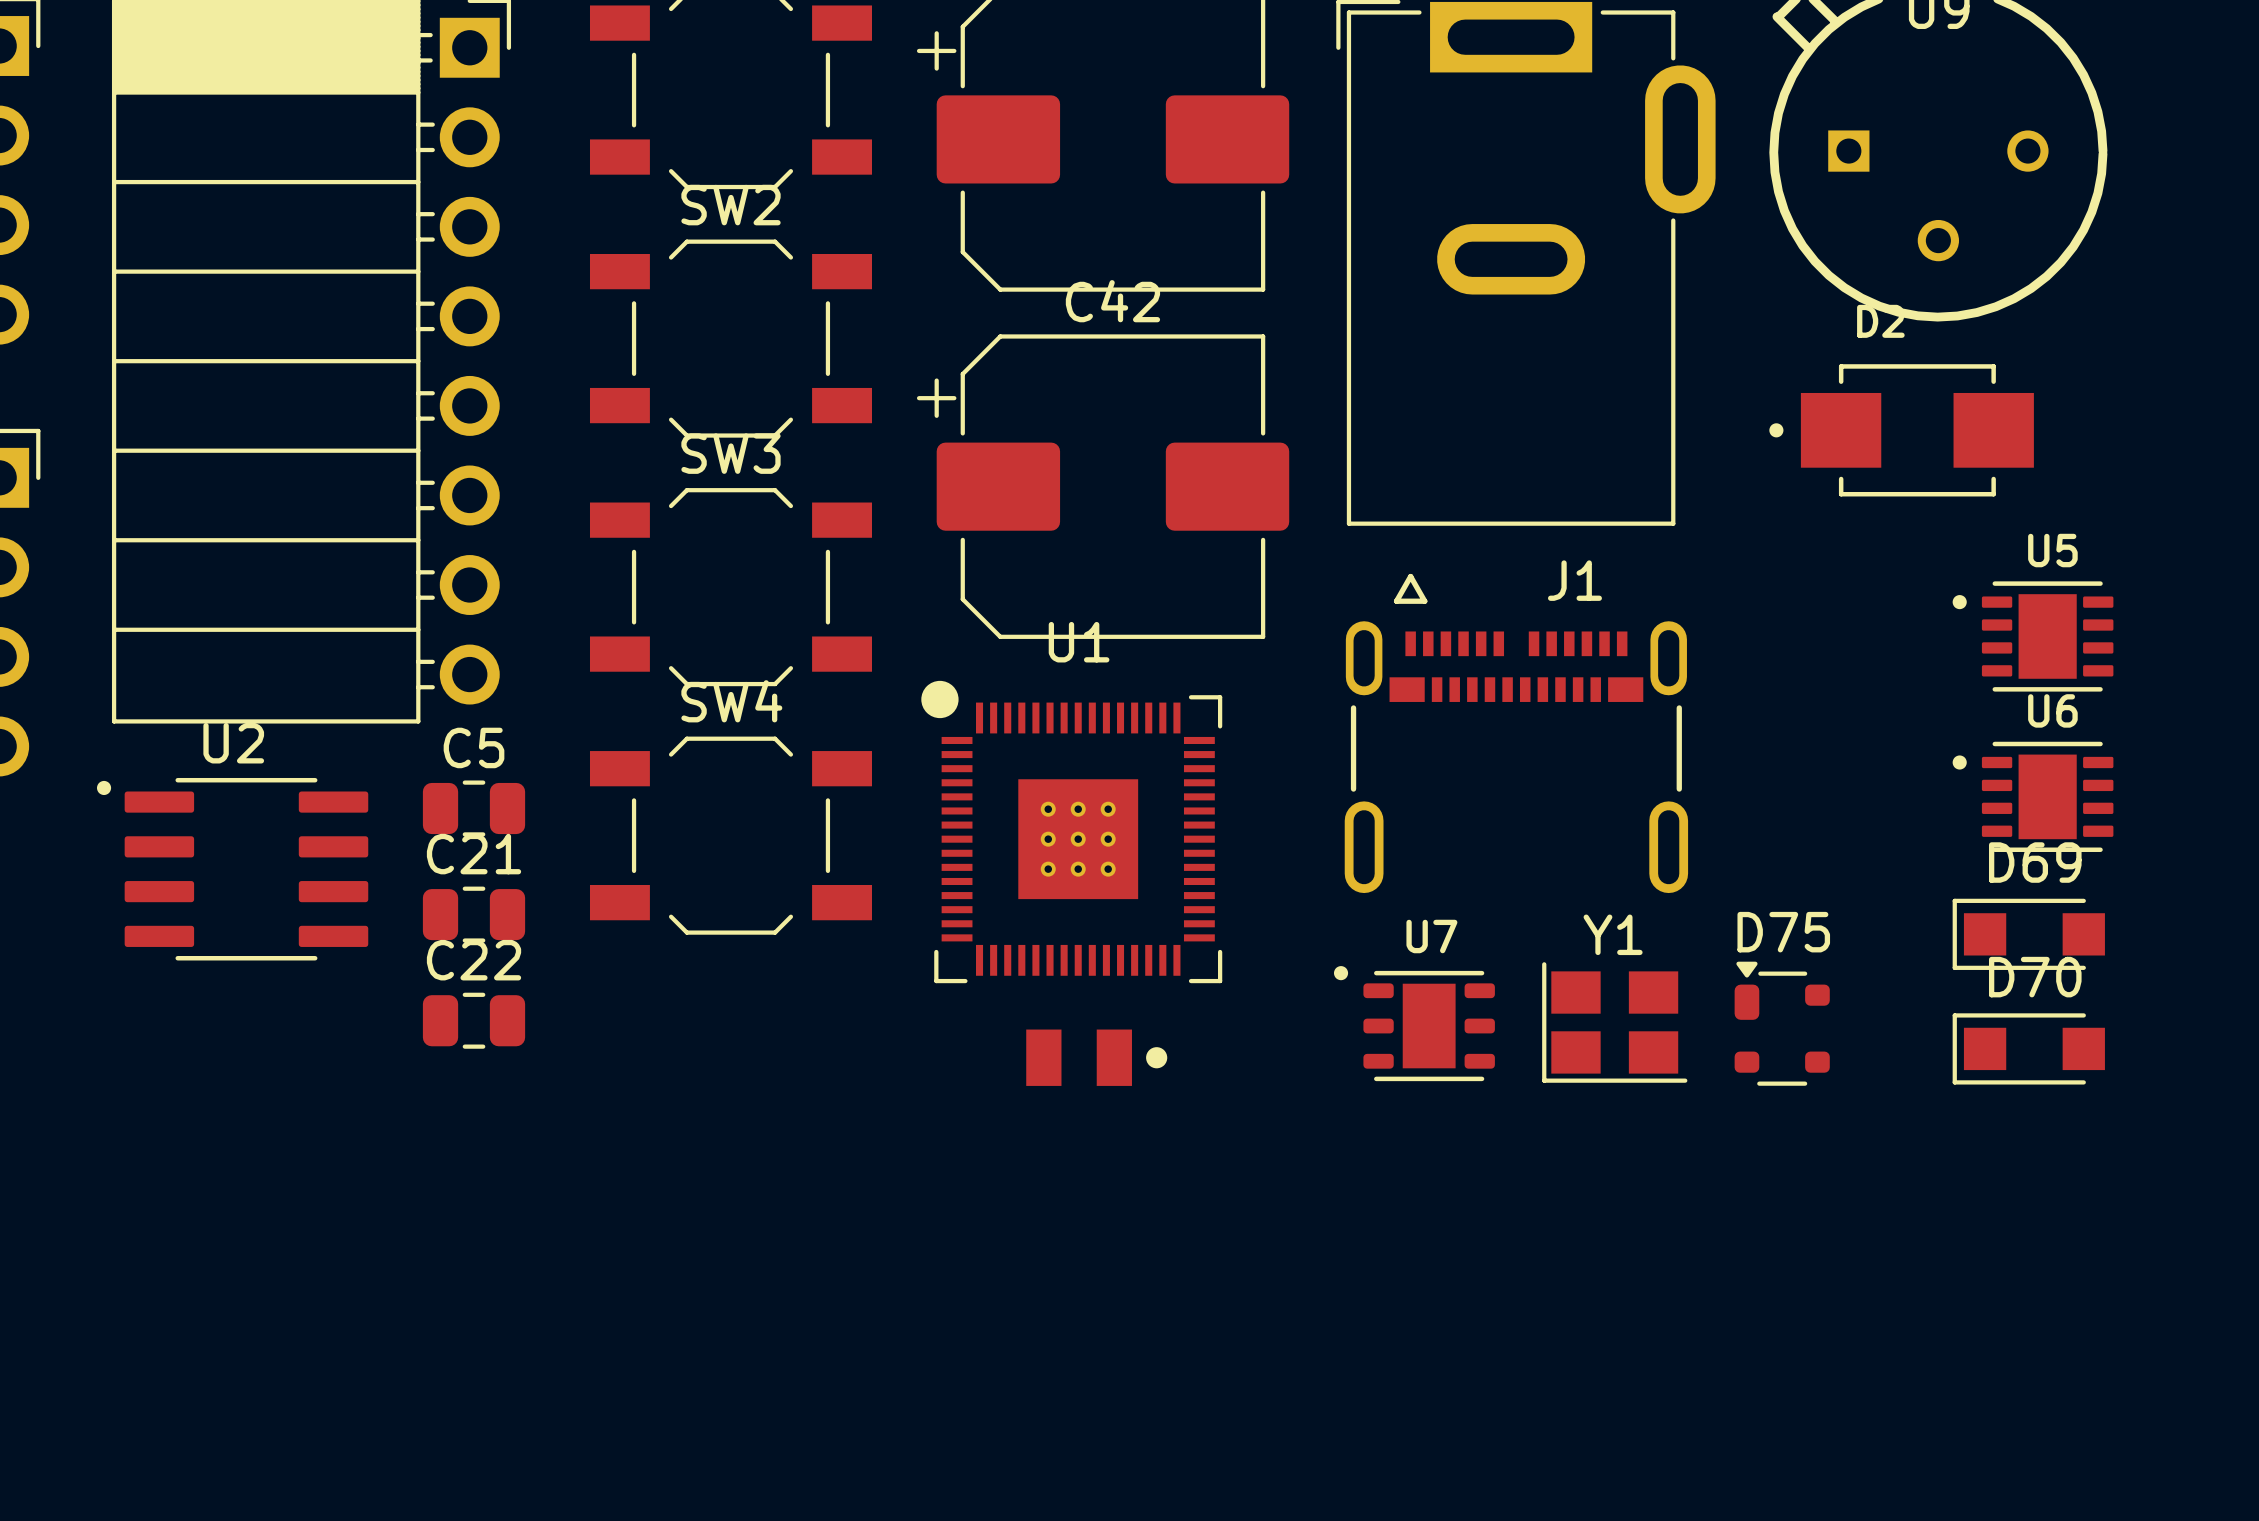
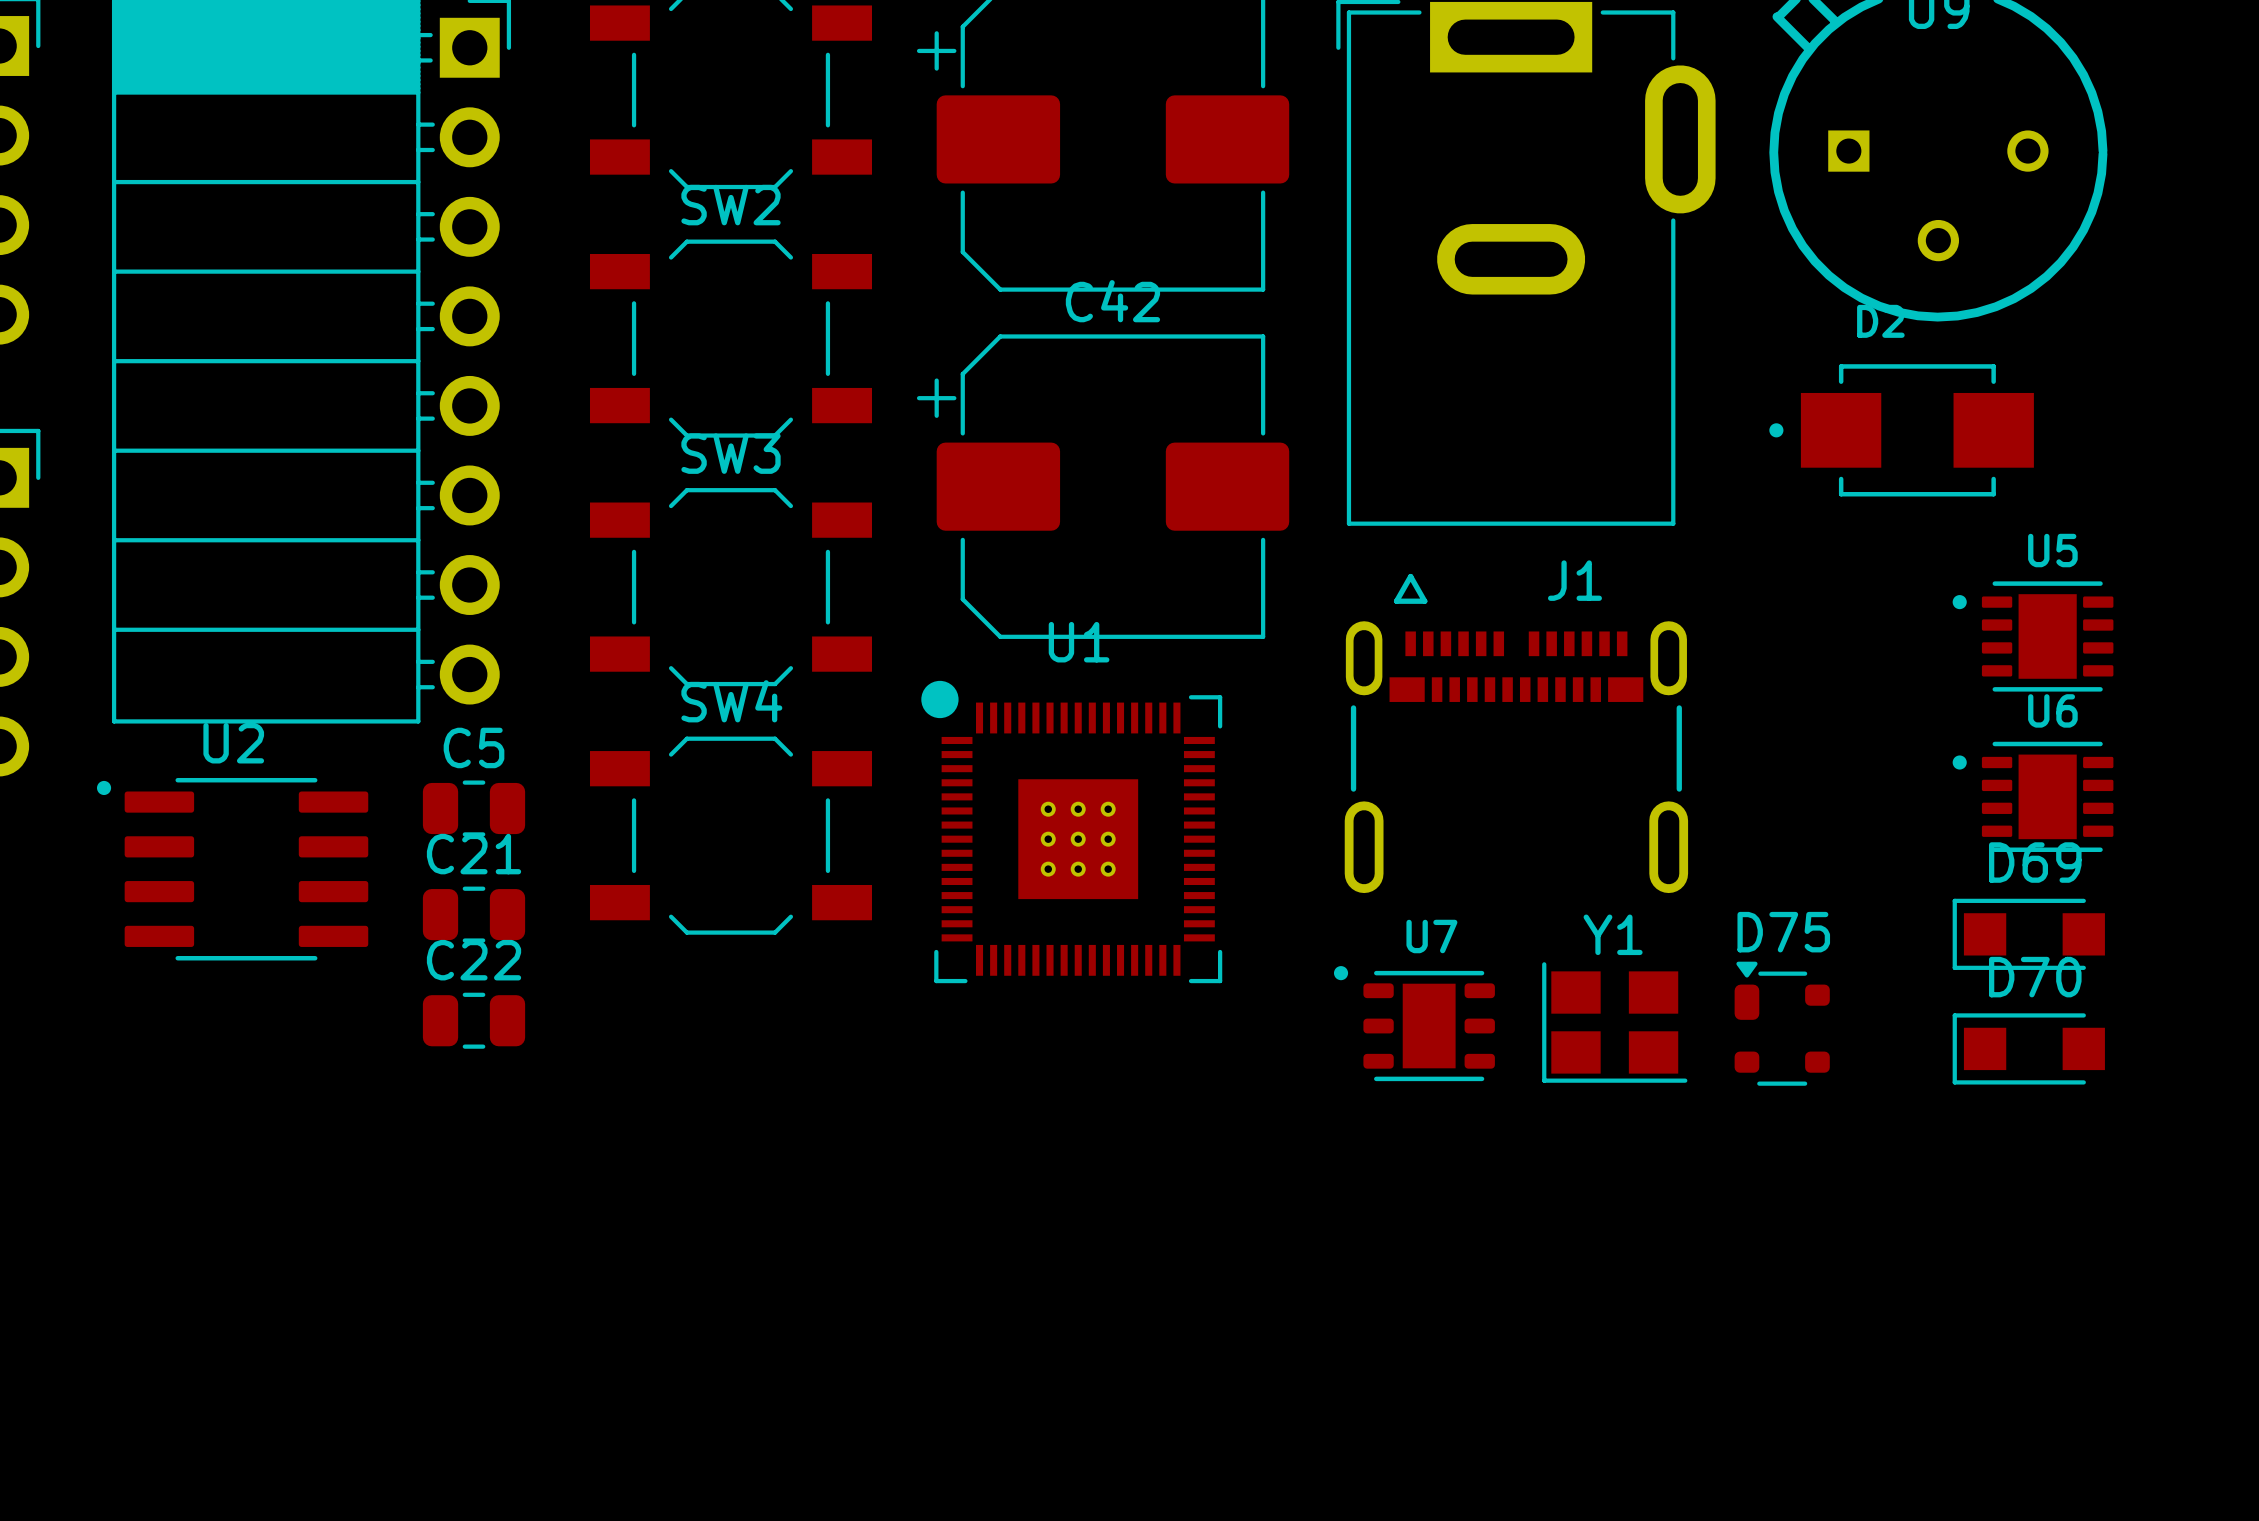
part: (1096, 1057) -> none

